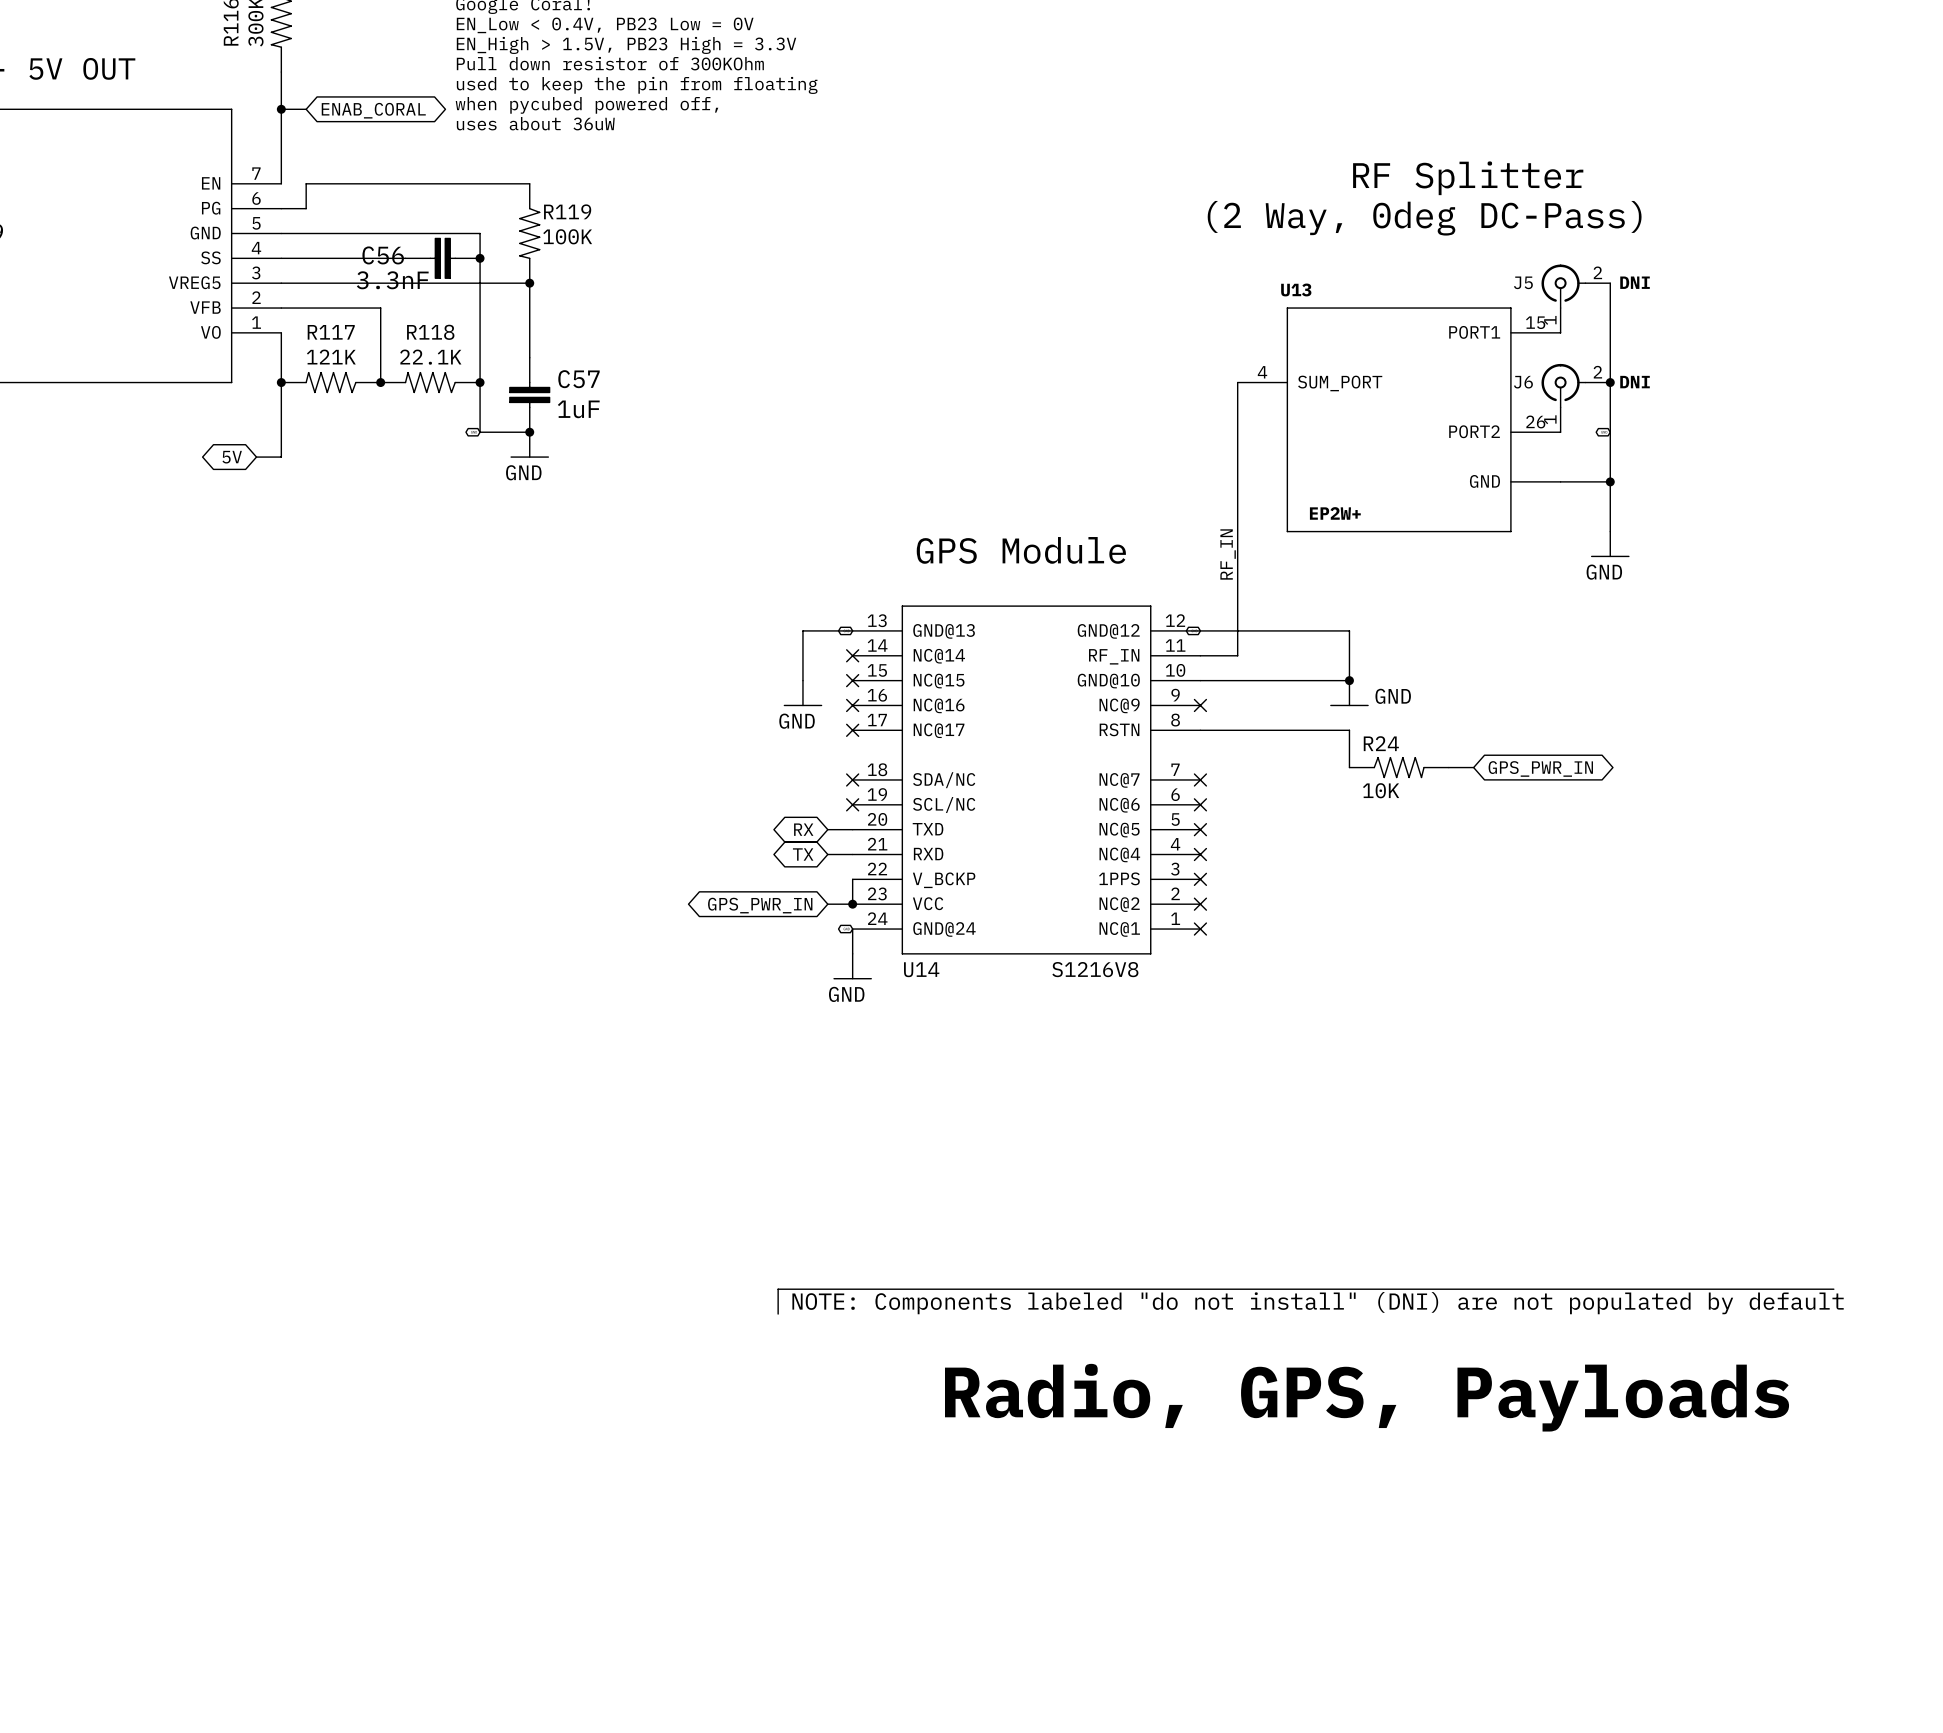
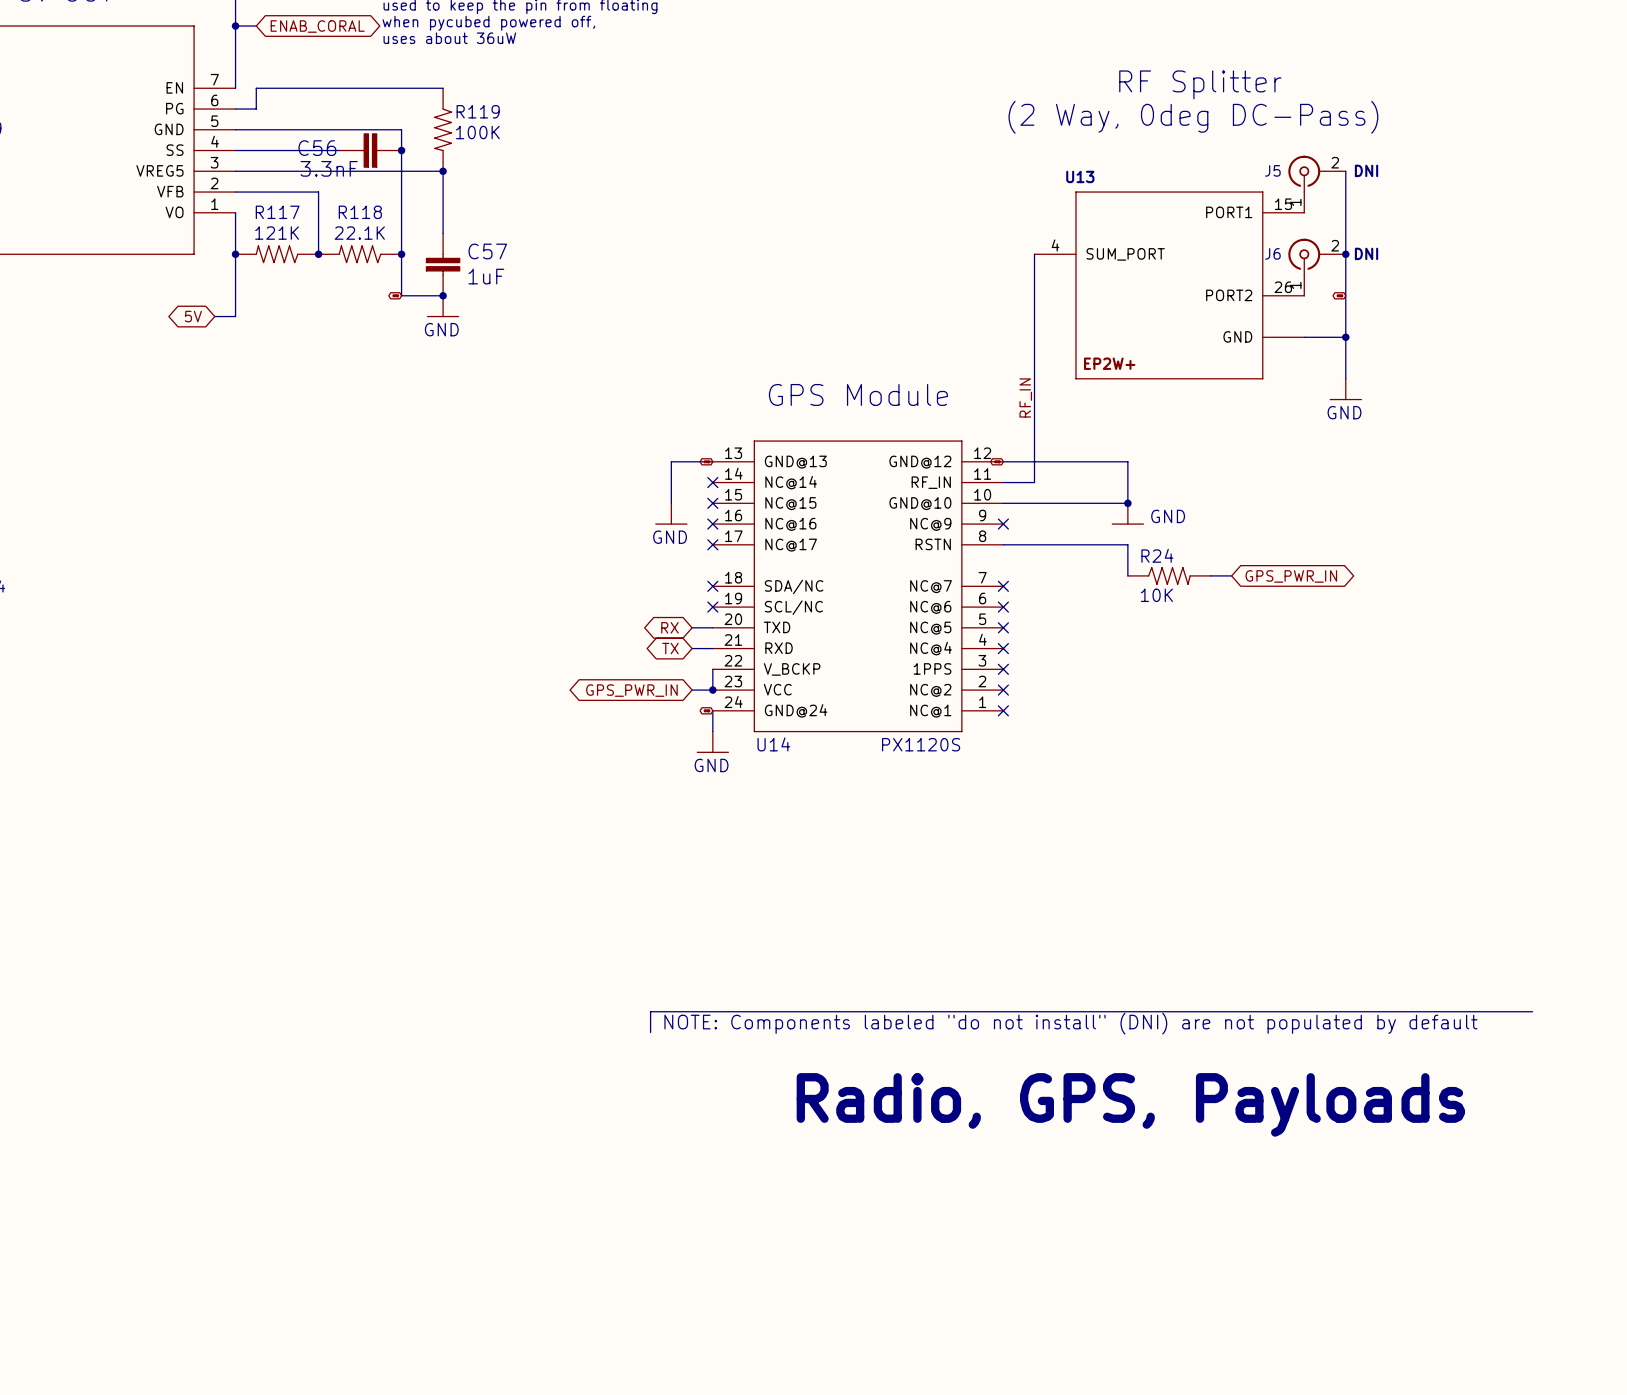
U14 value: S1216V8 (1095, 969) -> PX1120S (921, 744)

